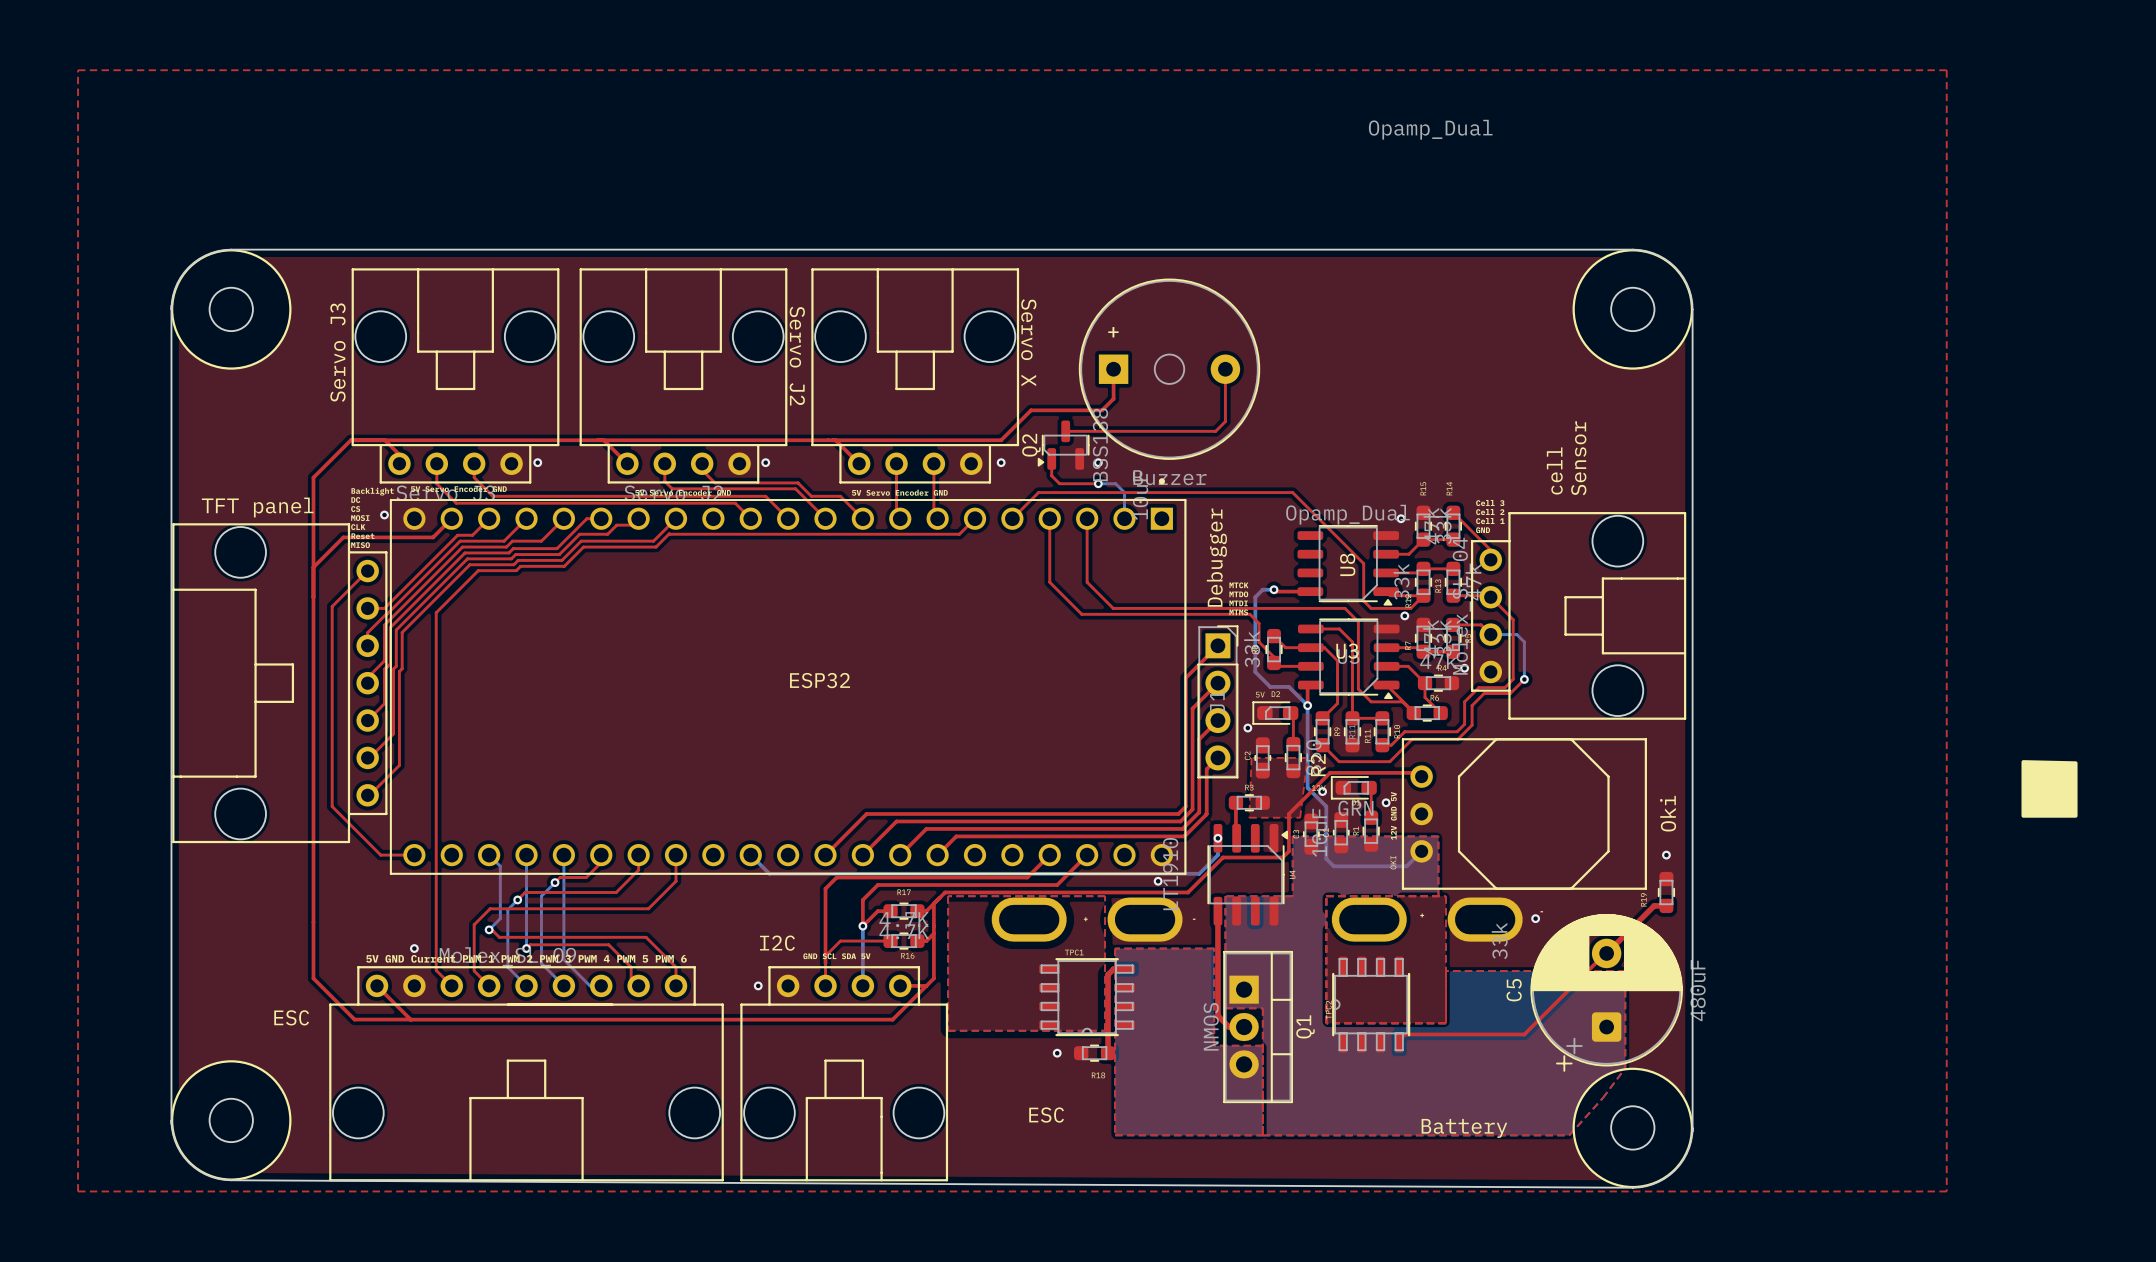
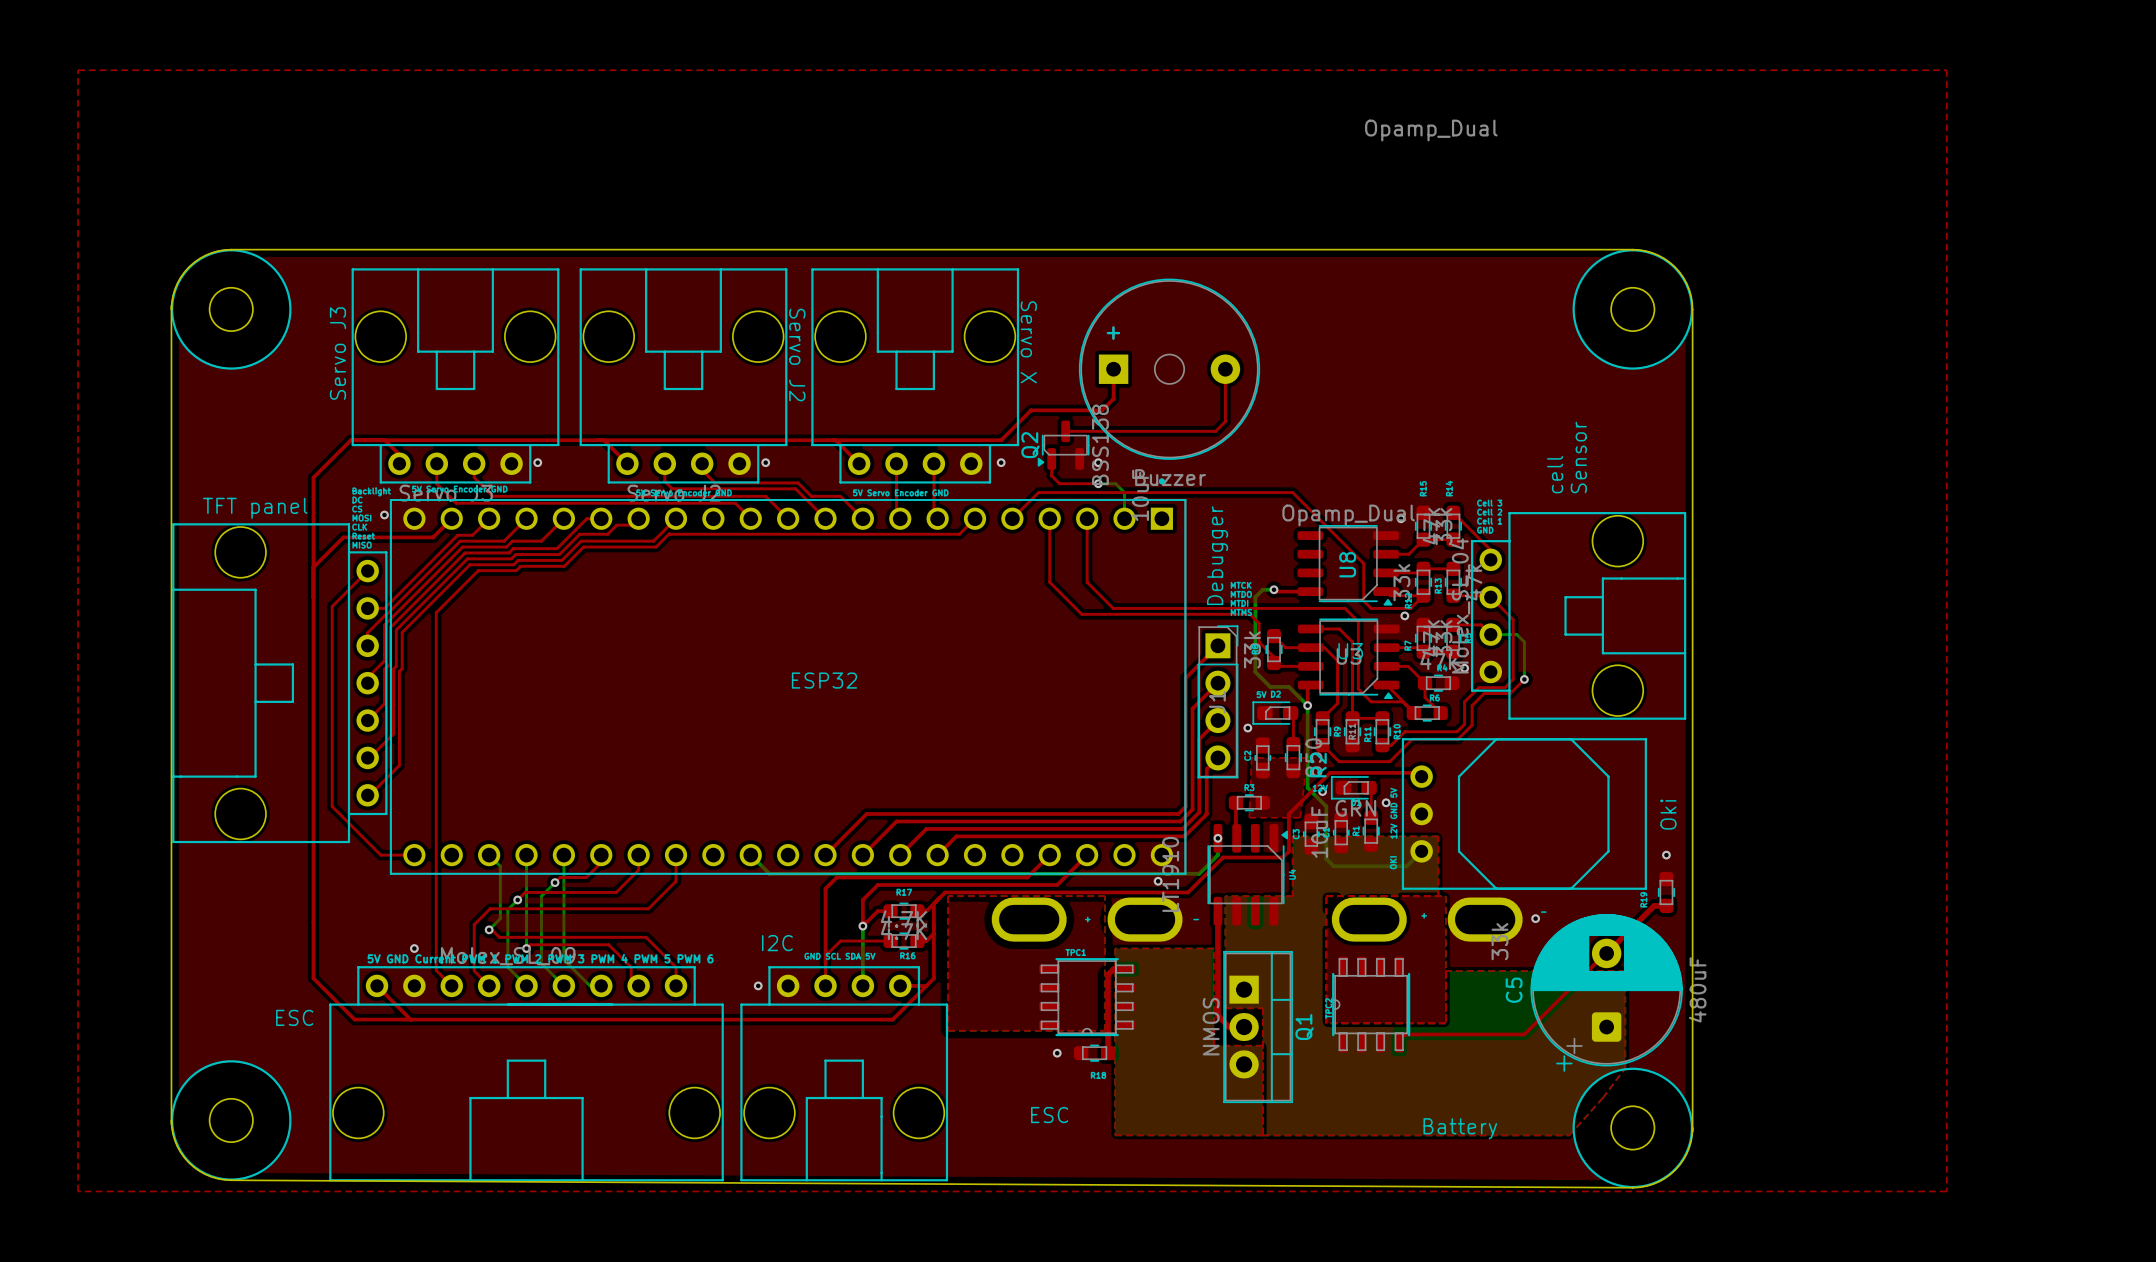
drawing: [2021, 760, 2078, 818] -> none

